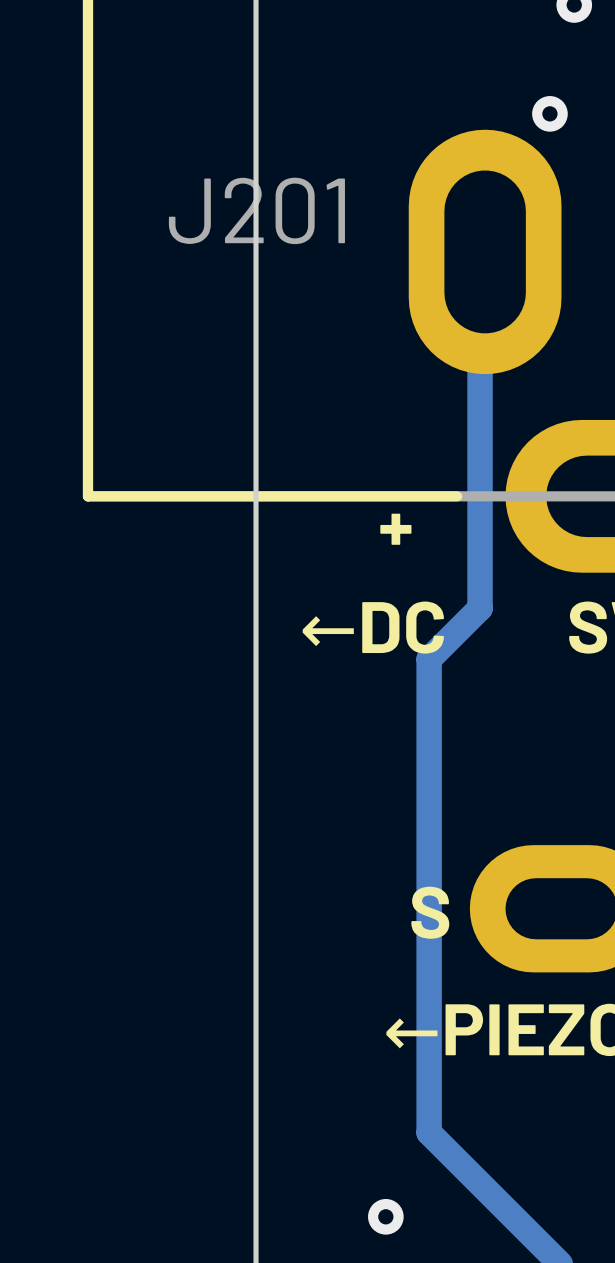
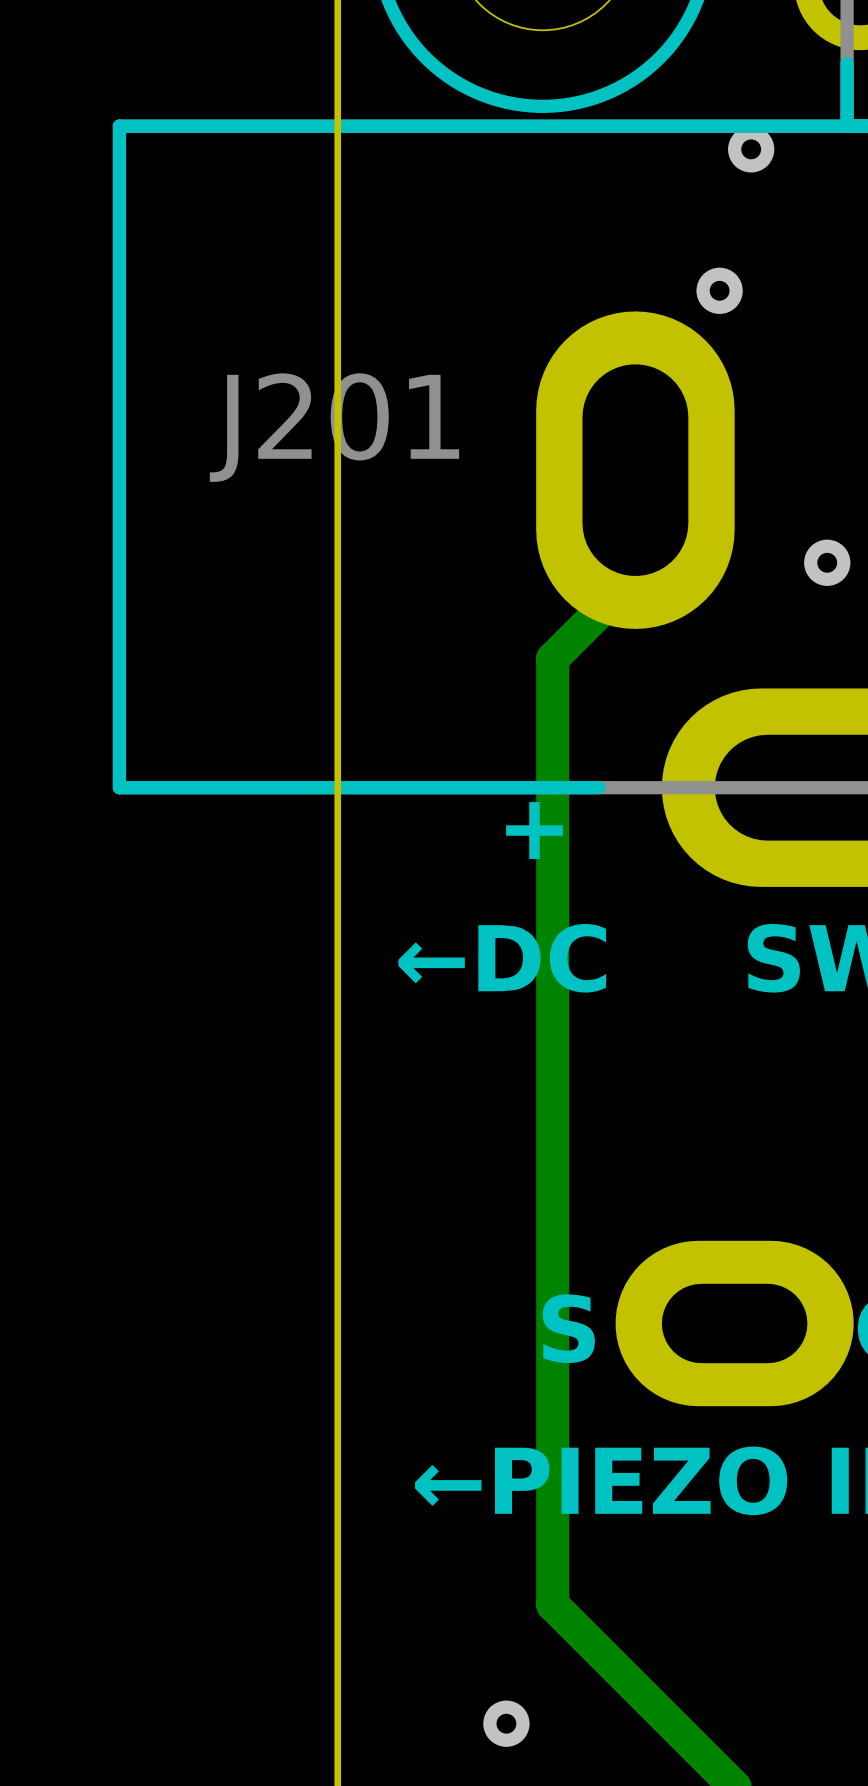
track: (485, 251) (480, 257) (480, 608) (429, 659) (429, 1132) -> (635, 470) (635, 576) (552, 658) (552, 1604) (562, 1614)

